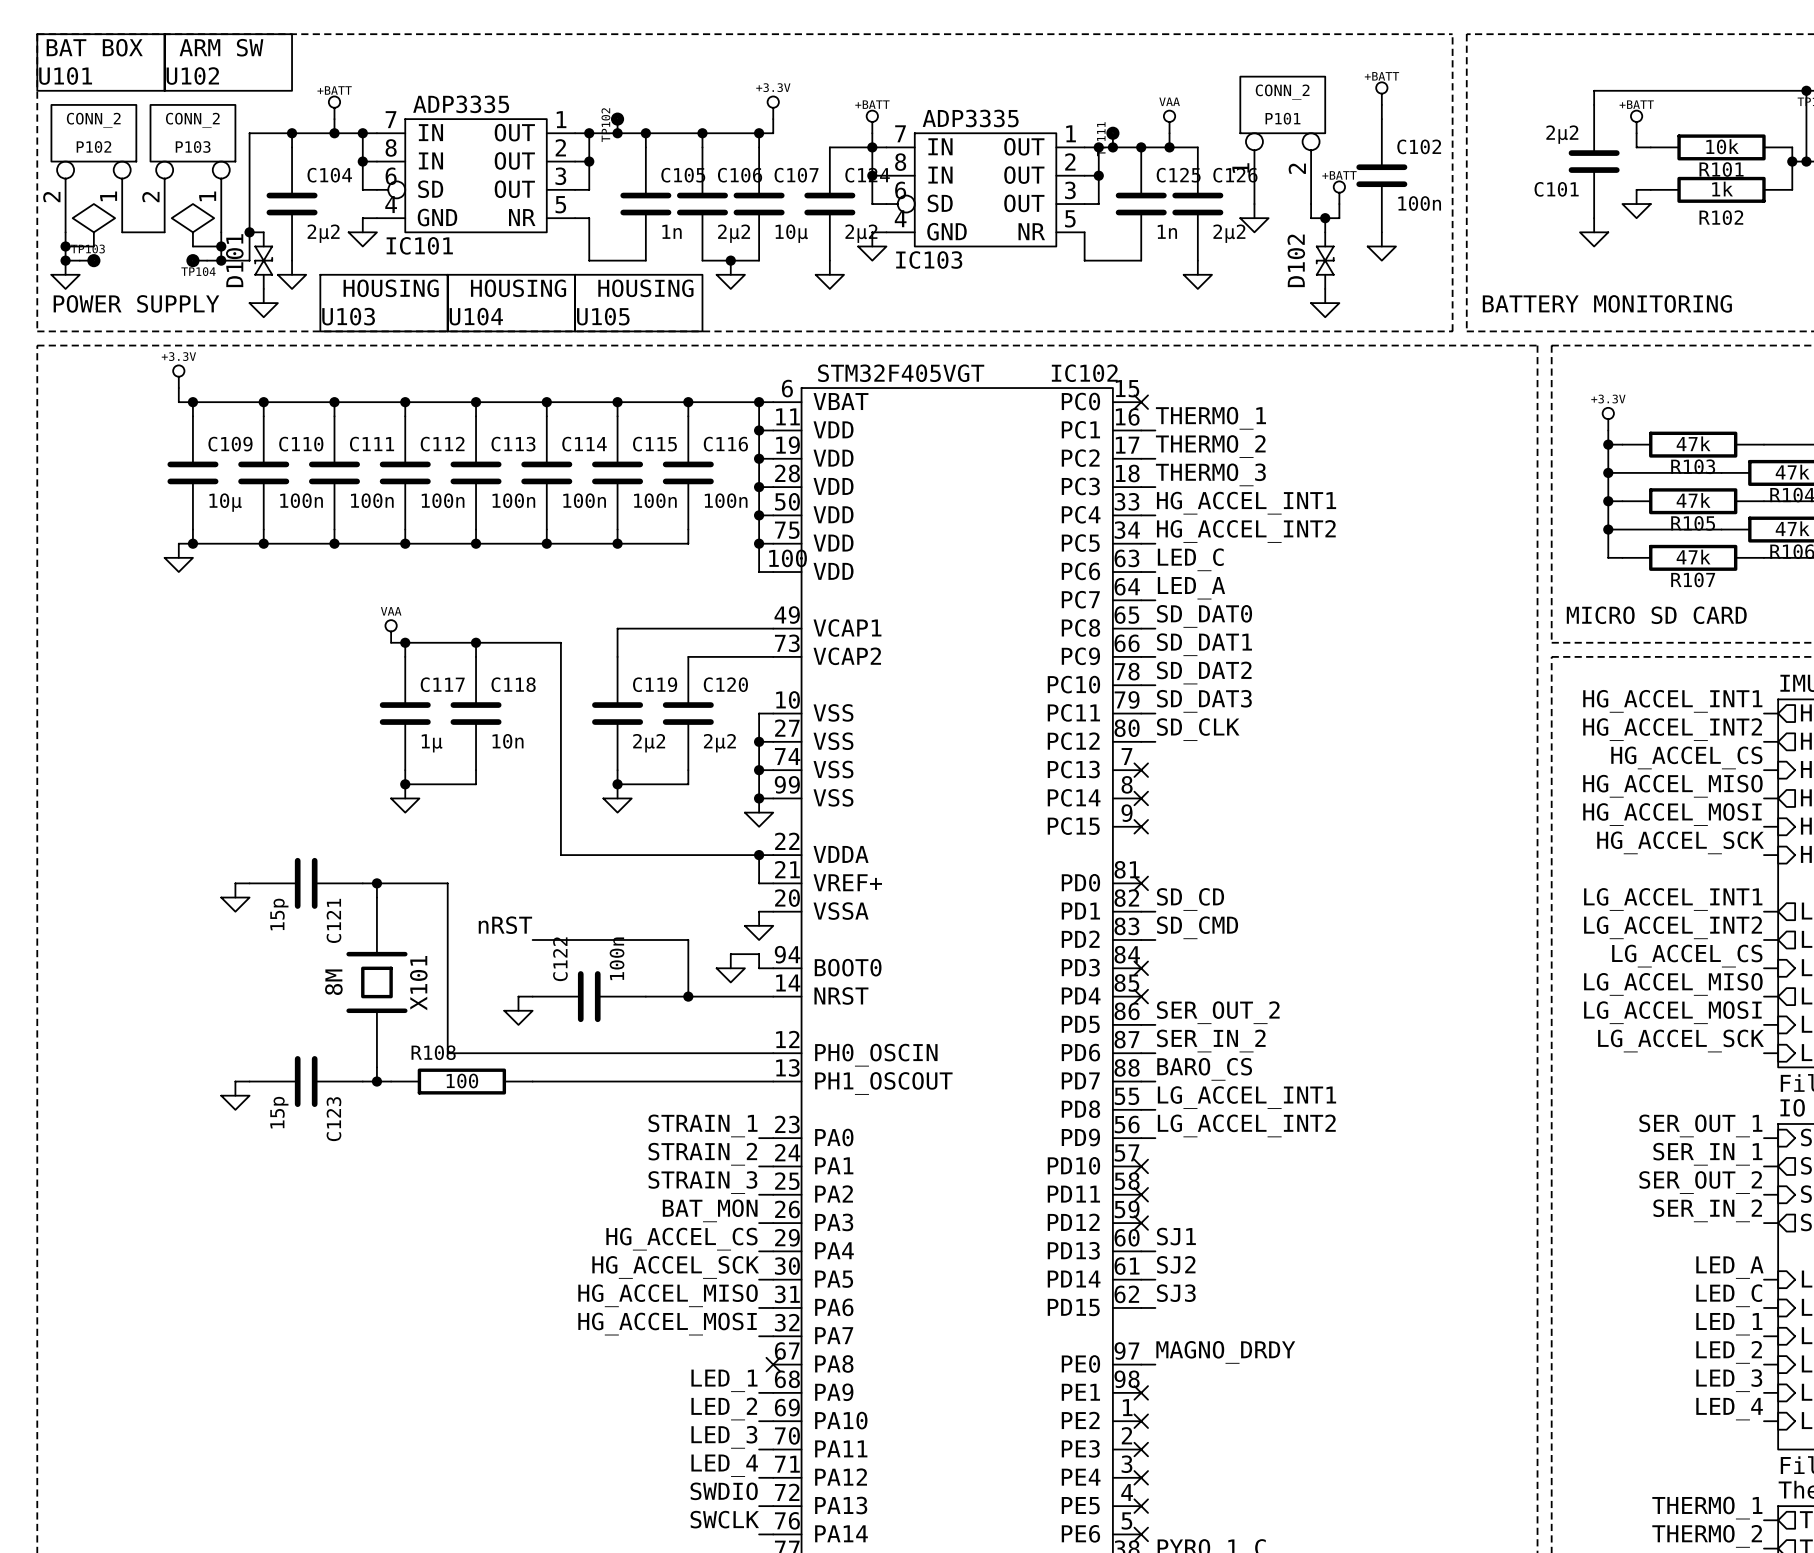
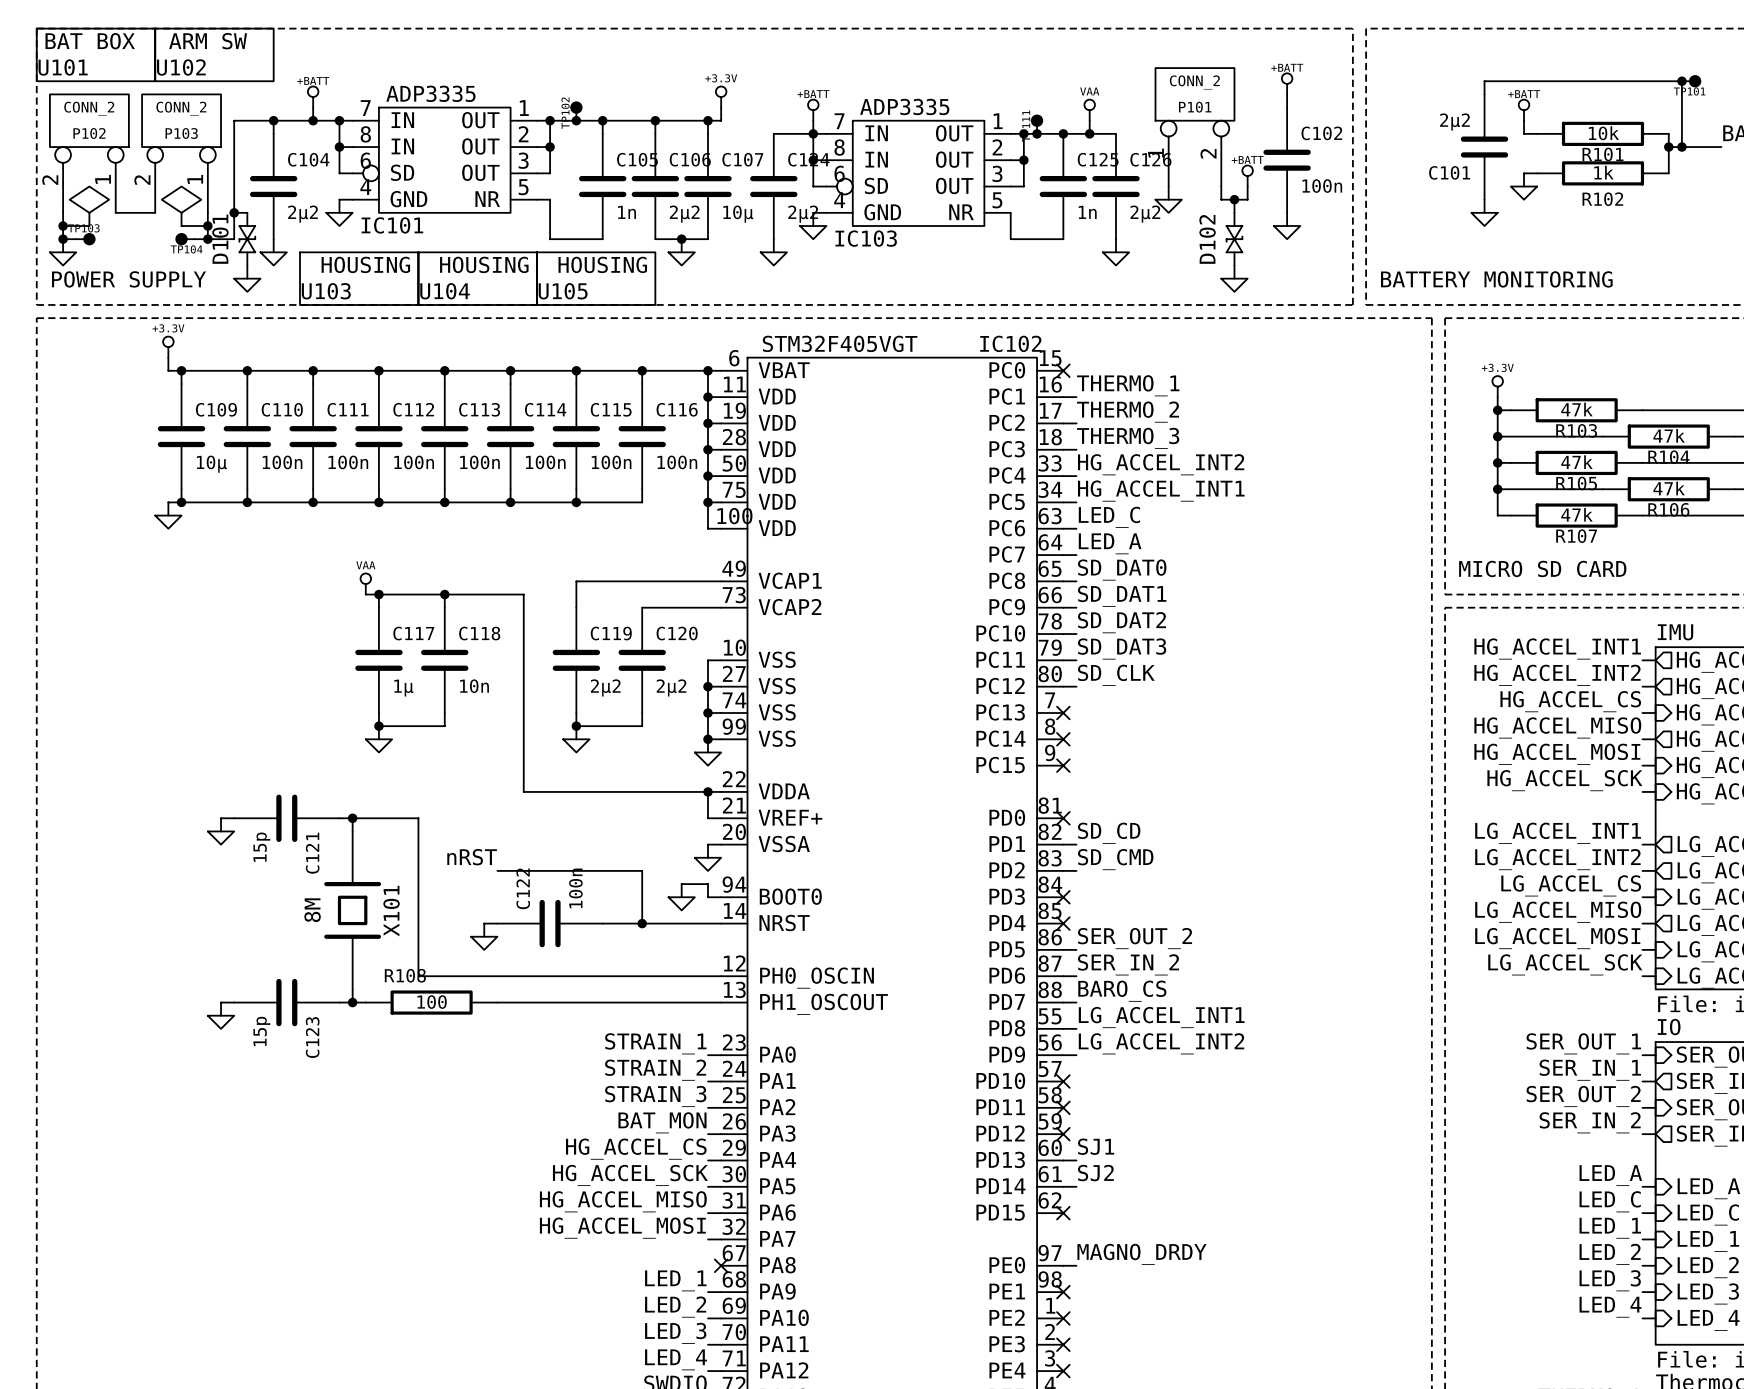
label: HG_ACCEL_INT1 (1246, 503) -> HG_ACCEL_INT2 (1161, 464)
label: HG_ACCEL_INT2 (1246, 531) -> HG_ACCEL_INT1 (1161, 491)
label: SJ3 (1176, 1293) -> none
wire: (1141, 1307) (1155, 1307) -> none
no-connect mark: none -> (1063, 1213)

